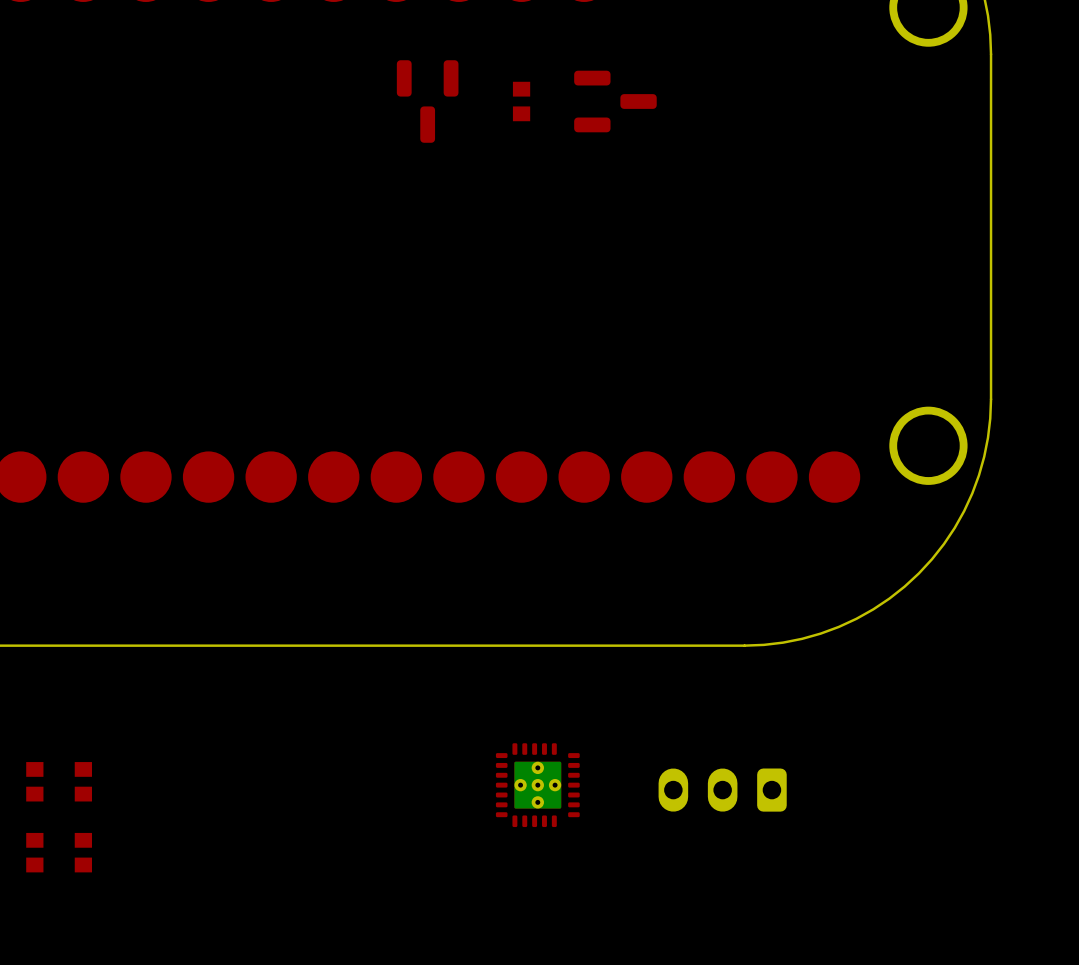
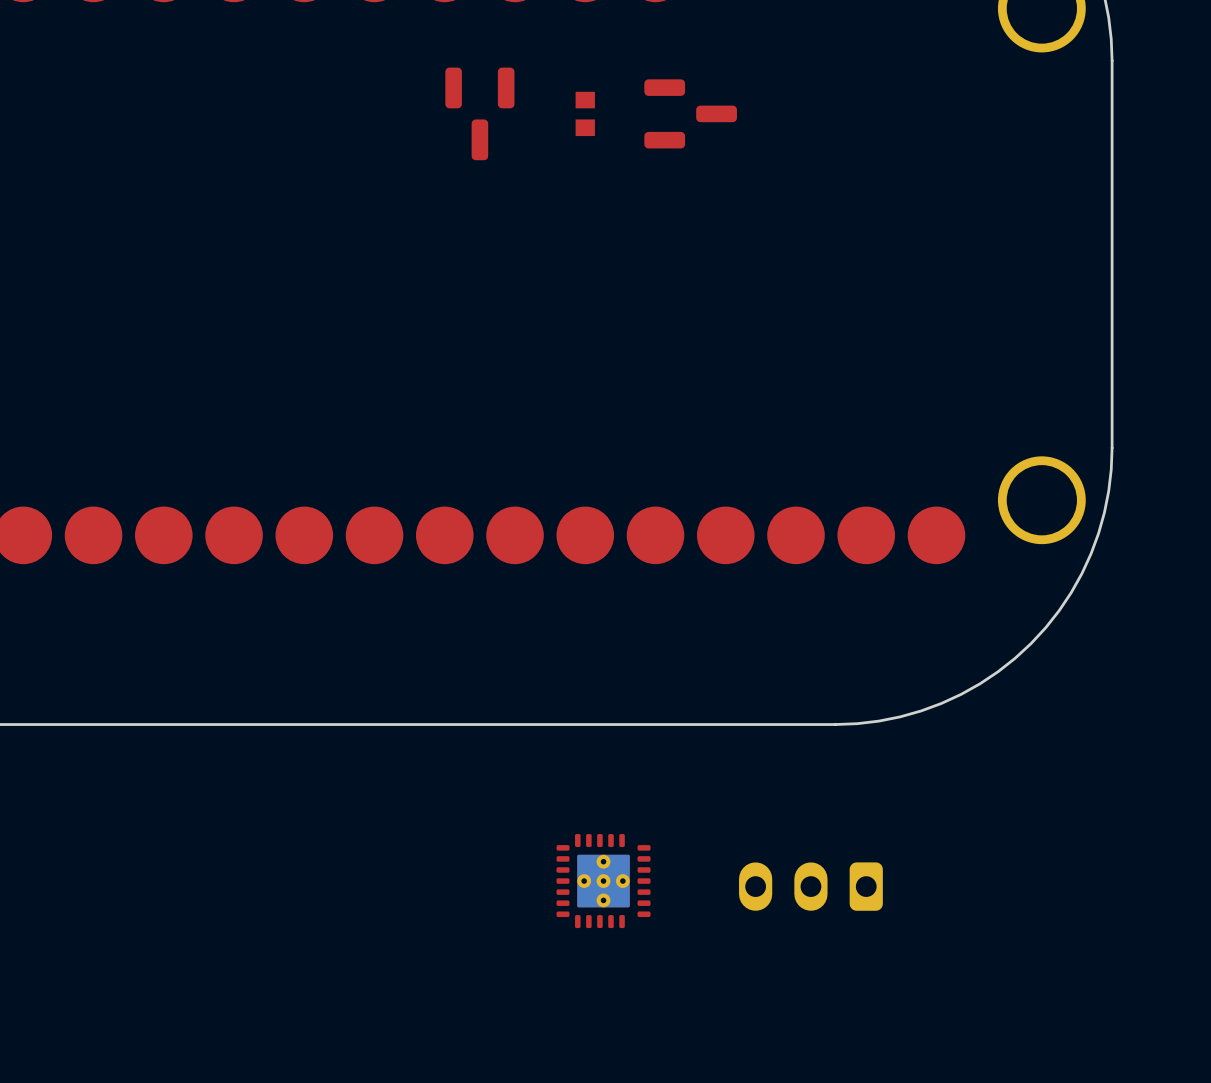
part: (34, 781) -> none
part: (83, 781) -> none
part: (34, 852) -> none
part: (83, 852) -> none

